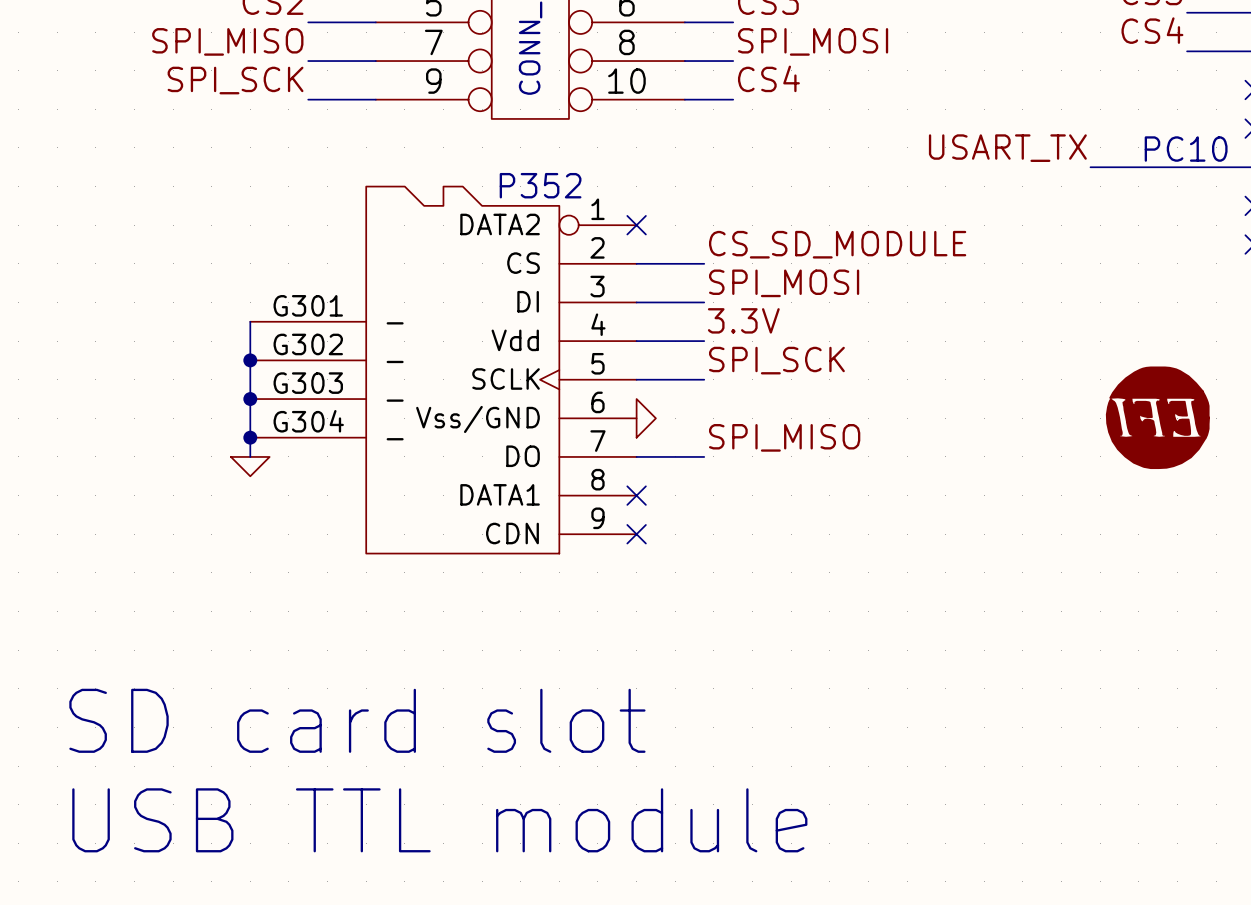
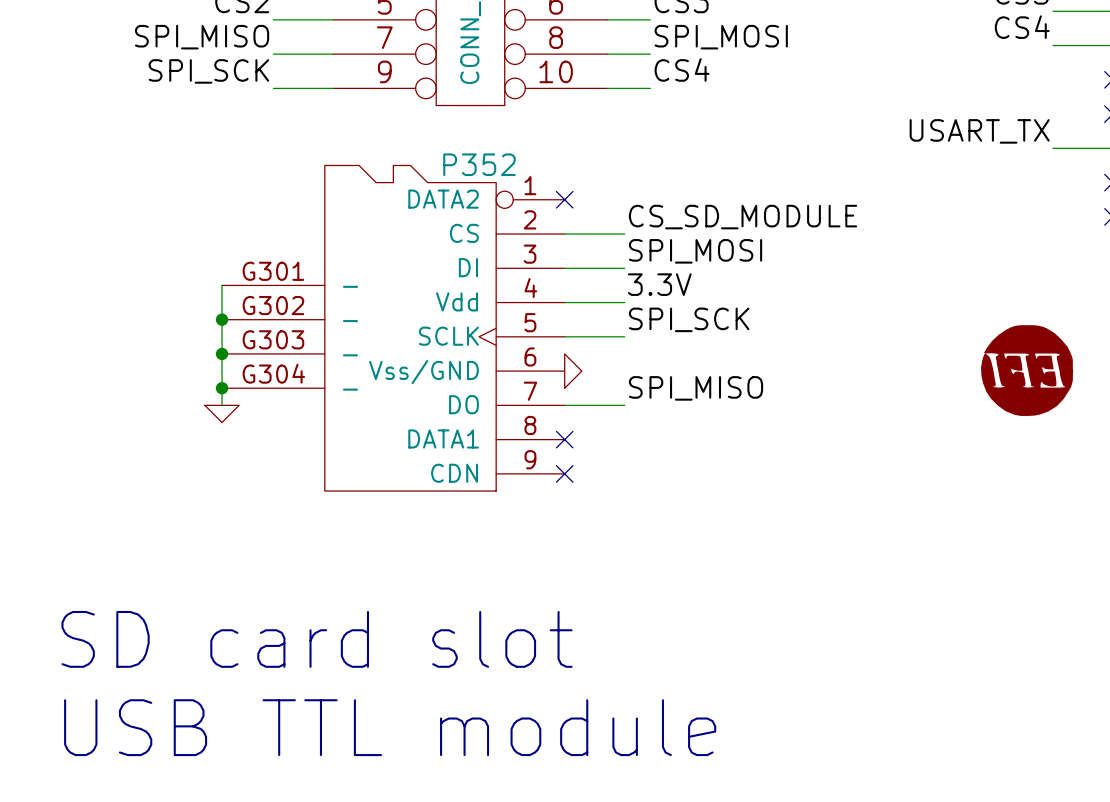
label position: USART_TX (1007, 148) -> USART_TX (979, 131)
text: PC10 (1186, 149) -> none
wire: (1090, 167) (1187, 167) -> none

